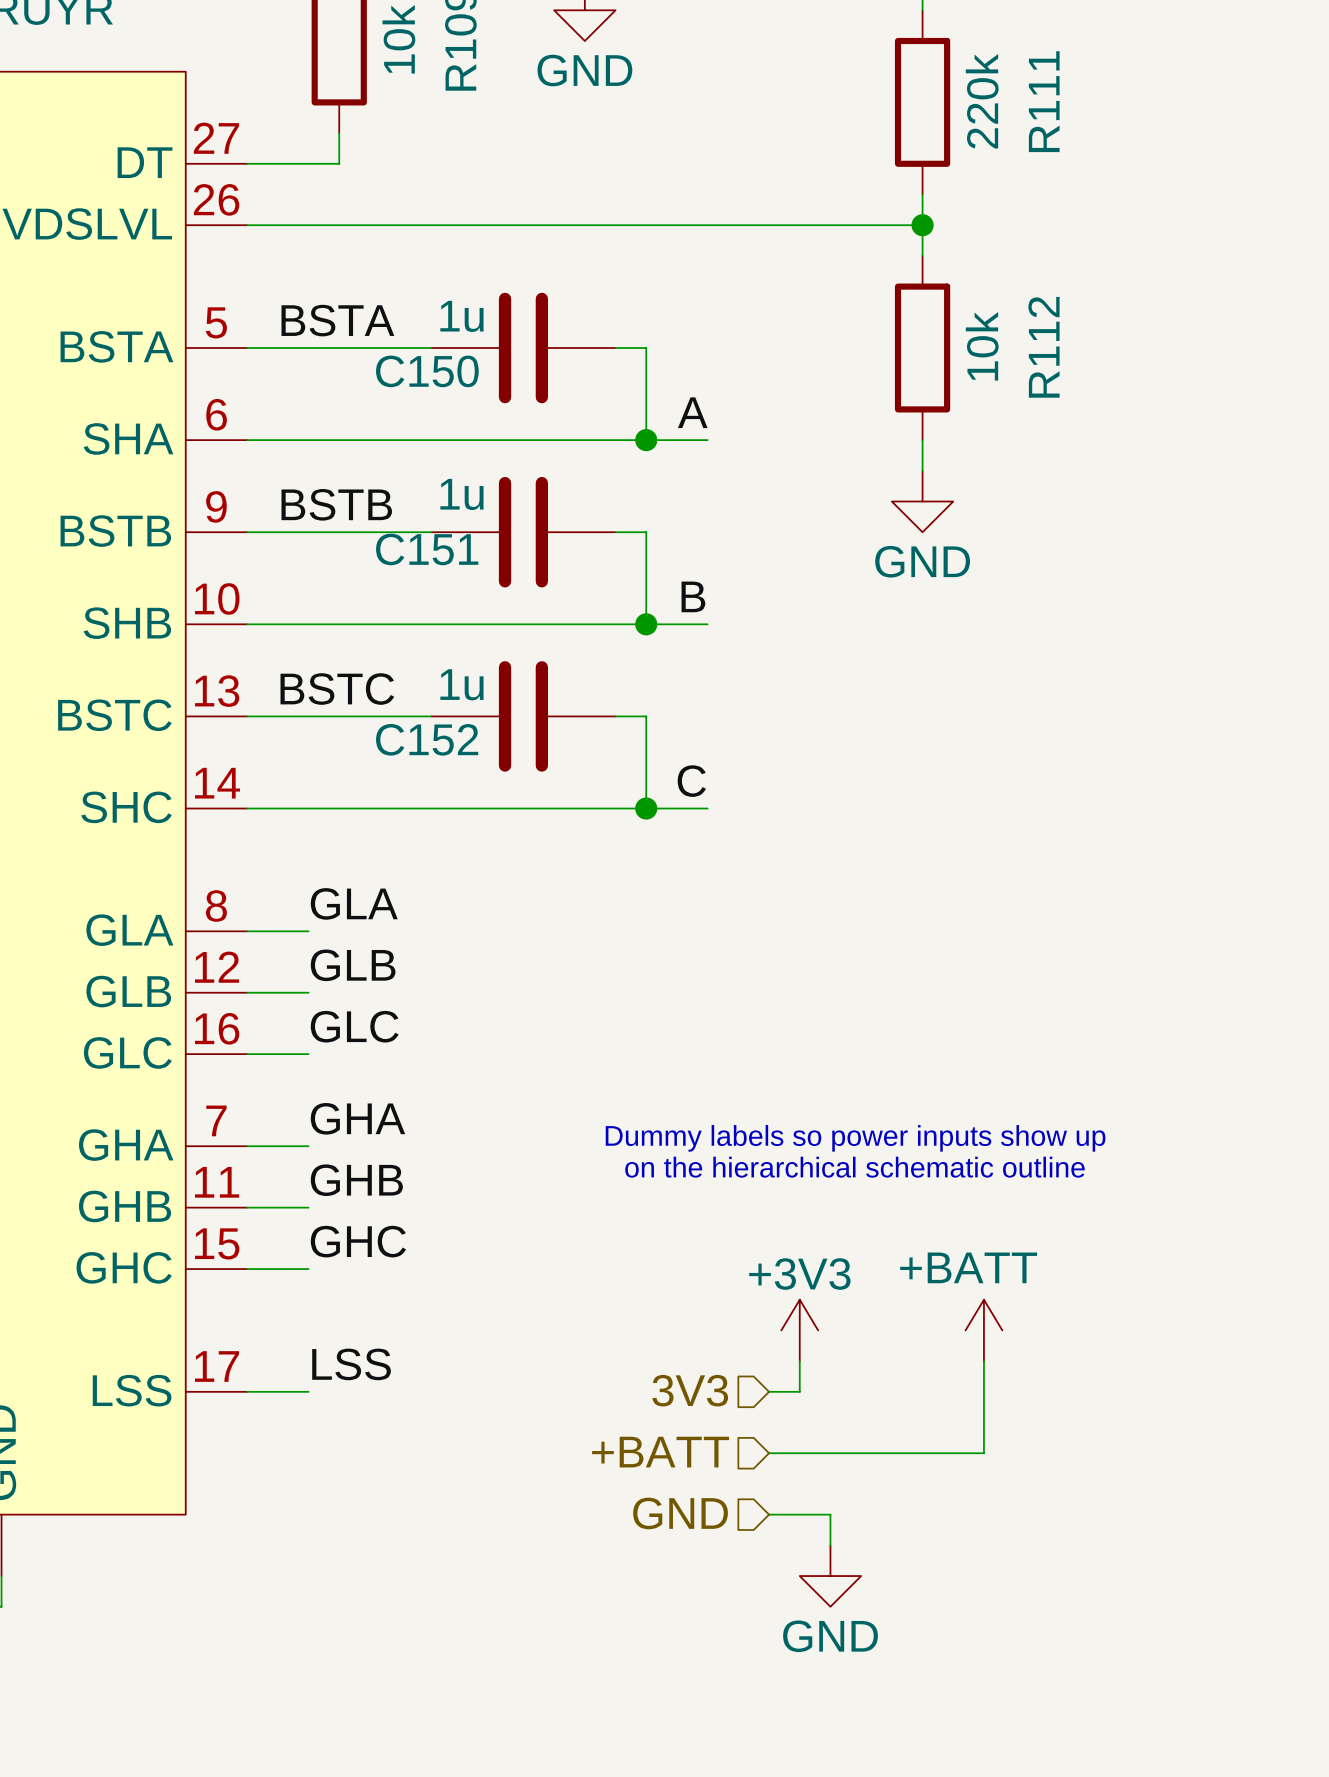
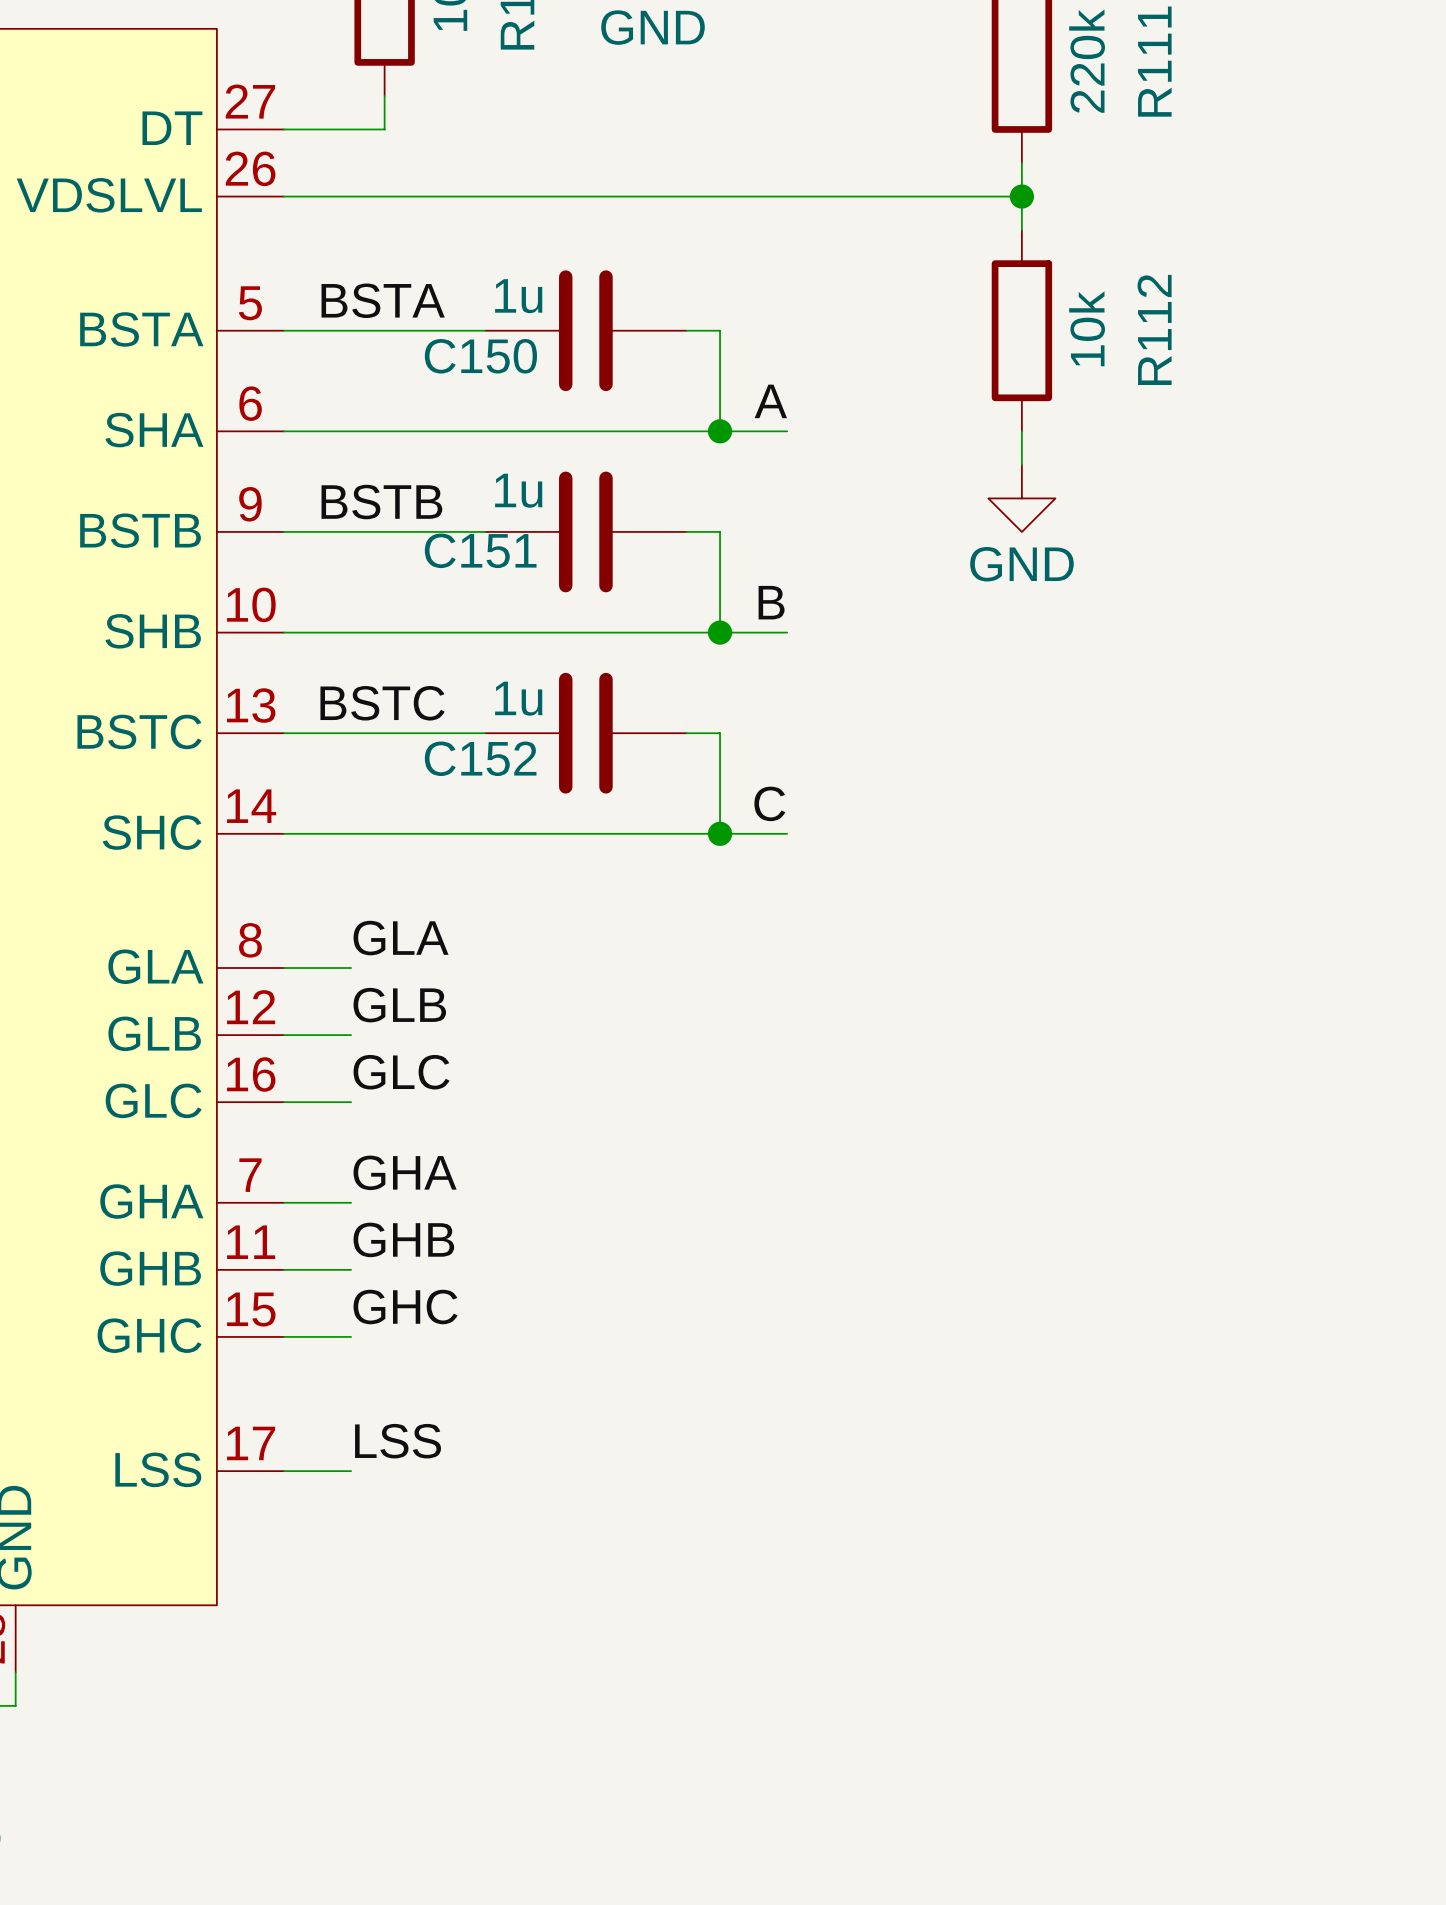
text: Dummy labels so power inputs show up (855, 1138) -> none
text: on the hierarchical schematic outline (854, 1167) -> none
power symbol: +3V3 (799, 1330) -> none
power symbol: +BATT (983, 1330) -> none
wire: (799, 1361) (799, 1391) (769, 1391) -> none
wire: (983, 1361) (983, 1453) (769, 1453) -> none
hierarchical label: 3V3 (690, 1390) -> none
hierarchical label: +BATT (660, 1452) -> none
hierarchical label: GND (680, 1513) -> none
wire: (769, 1514) (830, 1514) (830, 1545) -> none
power symbol: GND (830, 1576) -> none

